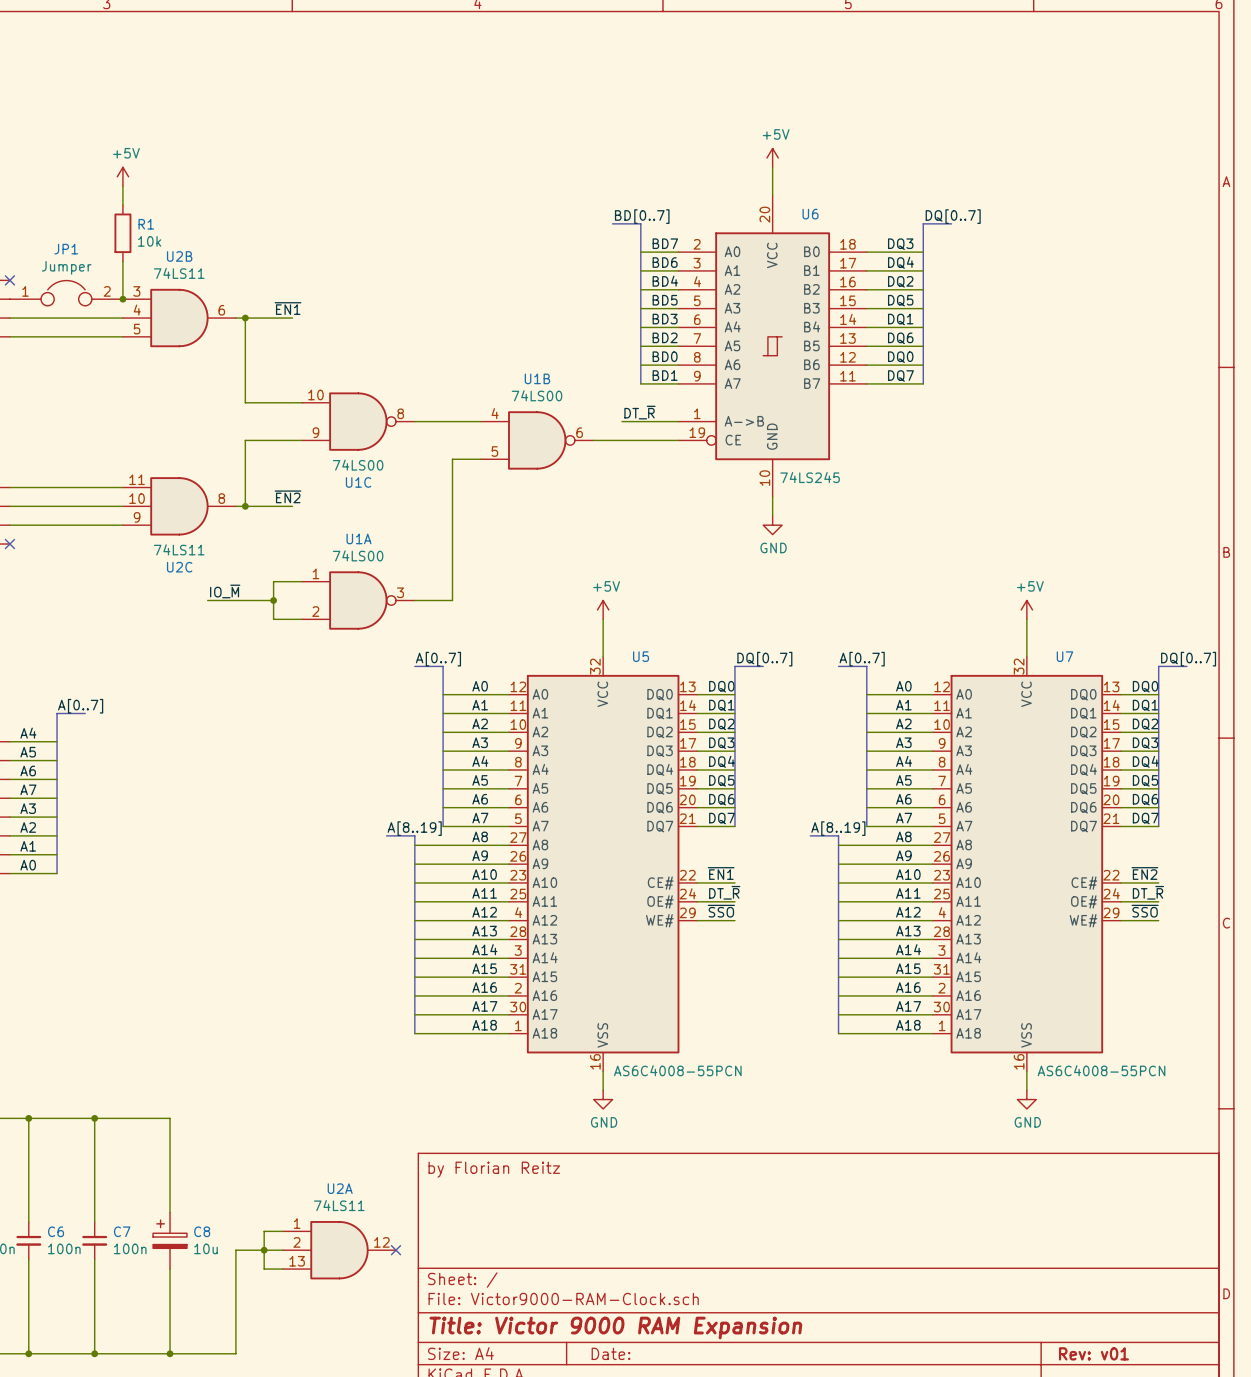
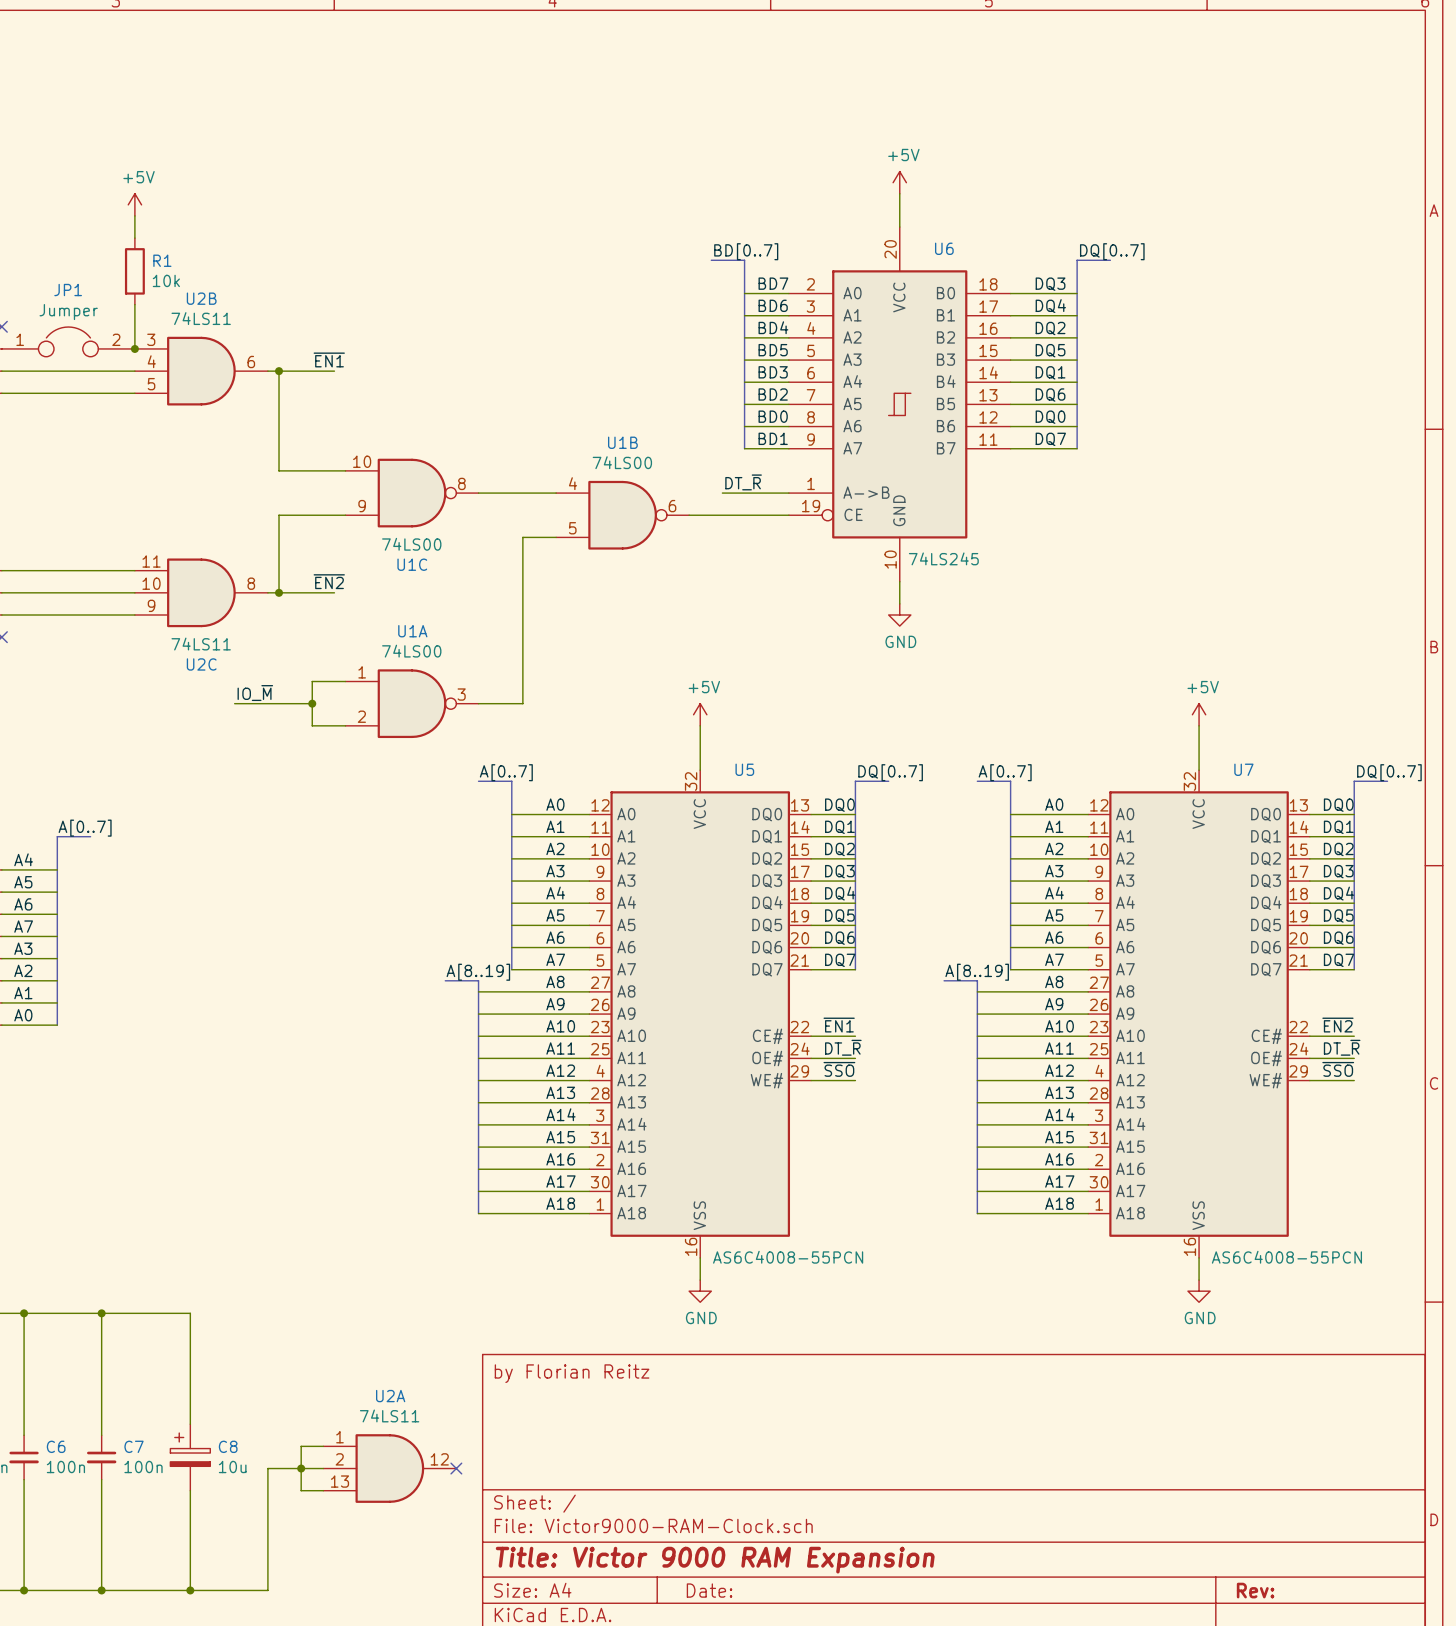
title block: Rev: v01 (1093, 1353) -> Rev: (1255, 1590)

